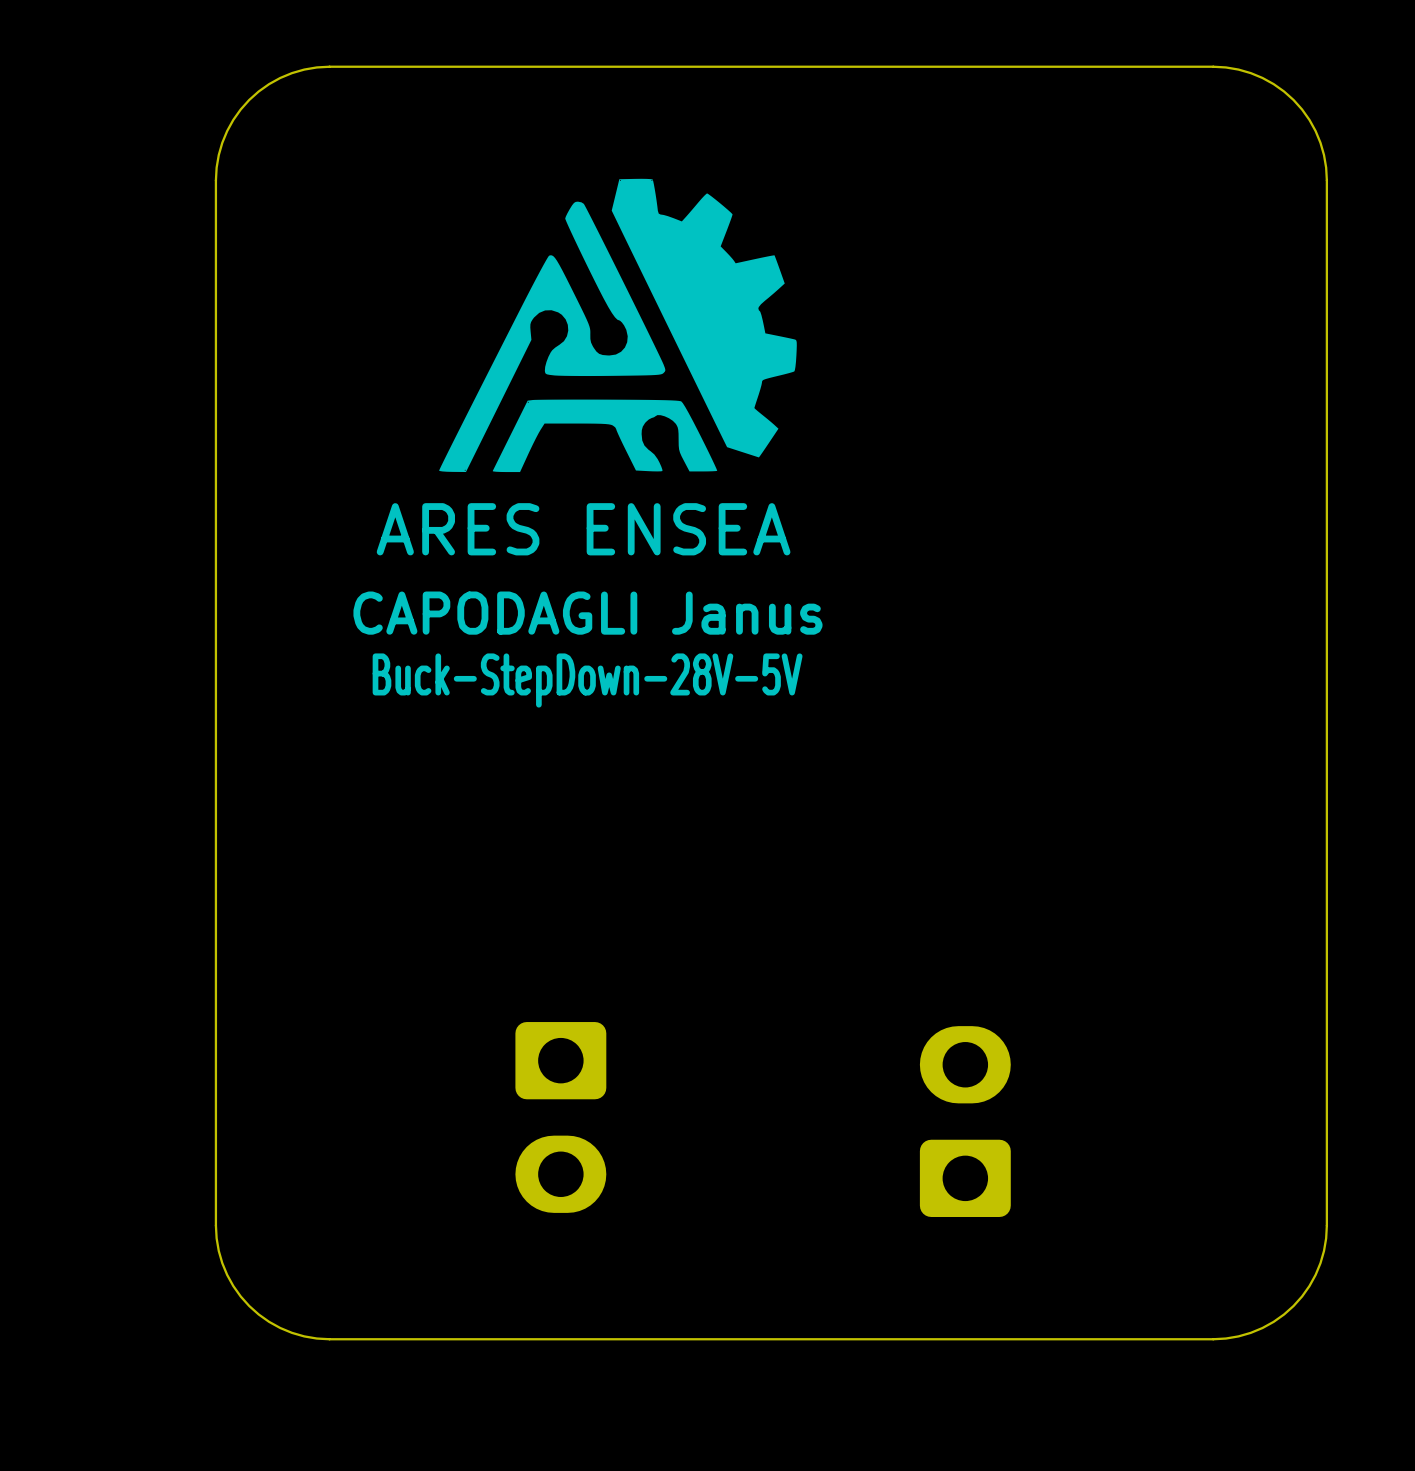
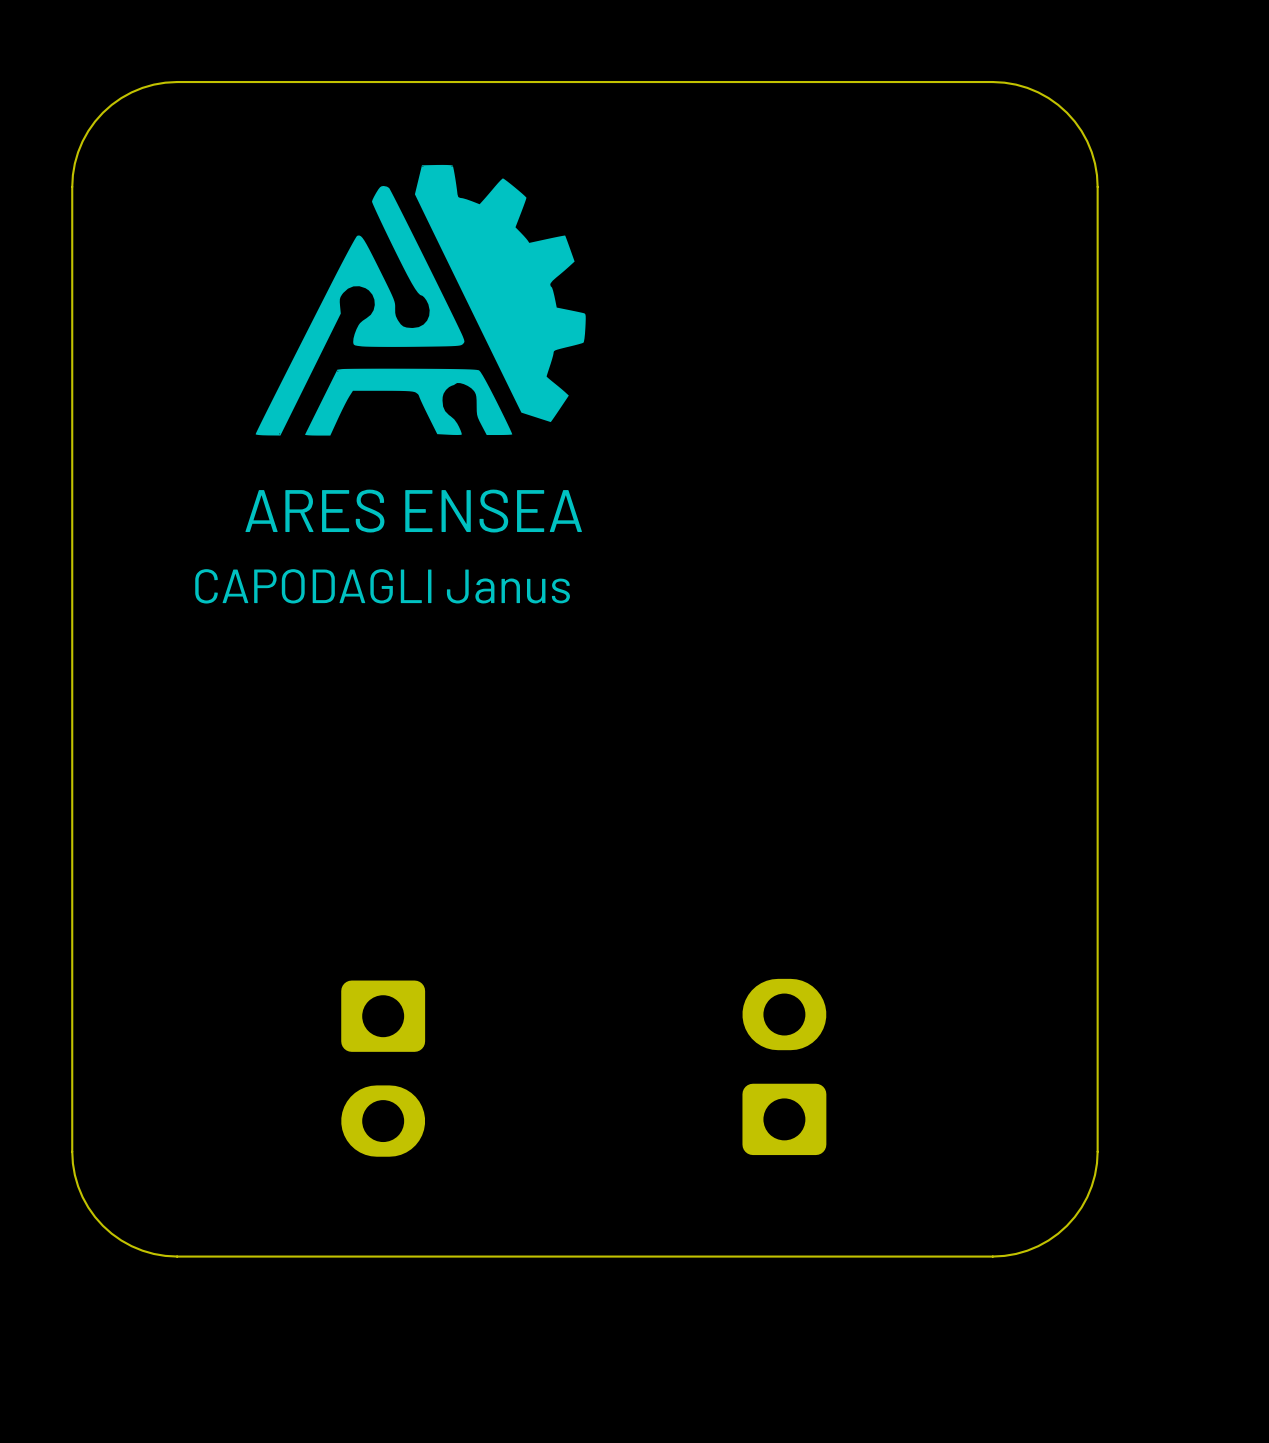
drawing position: (617, 325) -> (420, 300)
text position: ARES ENSEA (583, 529) -> ARES ENSEA (413, 511)
text: Buck-StepDown-28V-5V (587, 680) -> none
part position: (560, 1117) -> (383, 1068)
part position: (965, 1121) -> (784, 1066)

